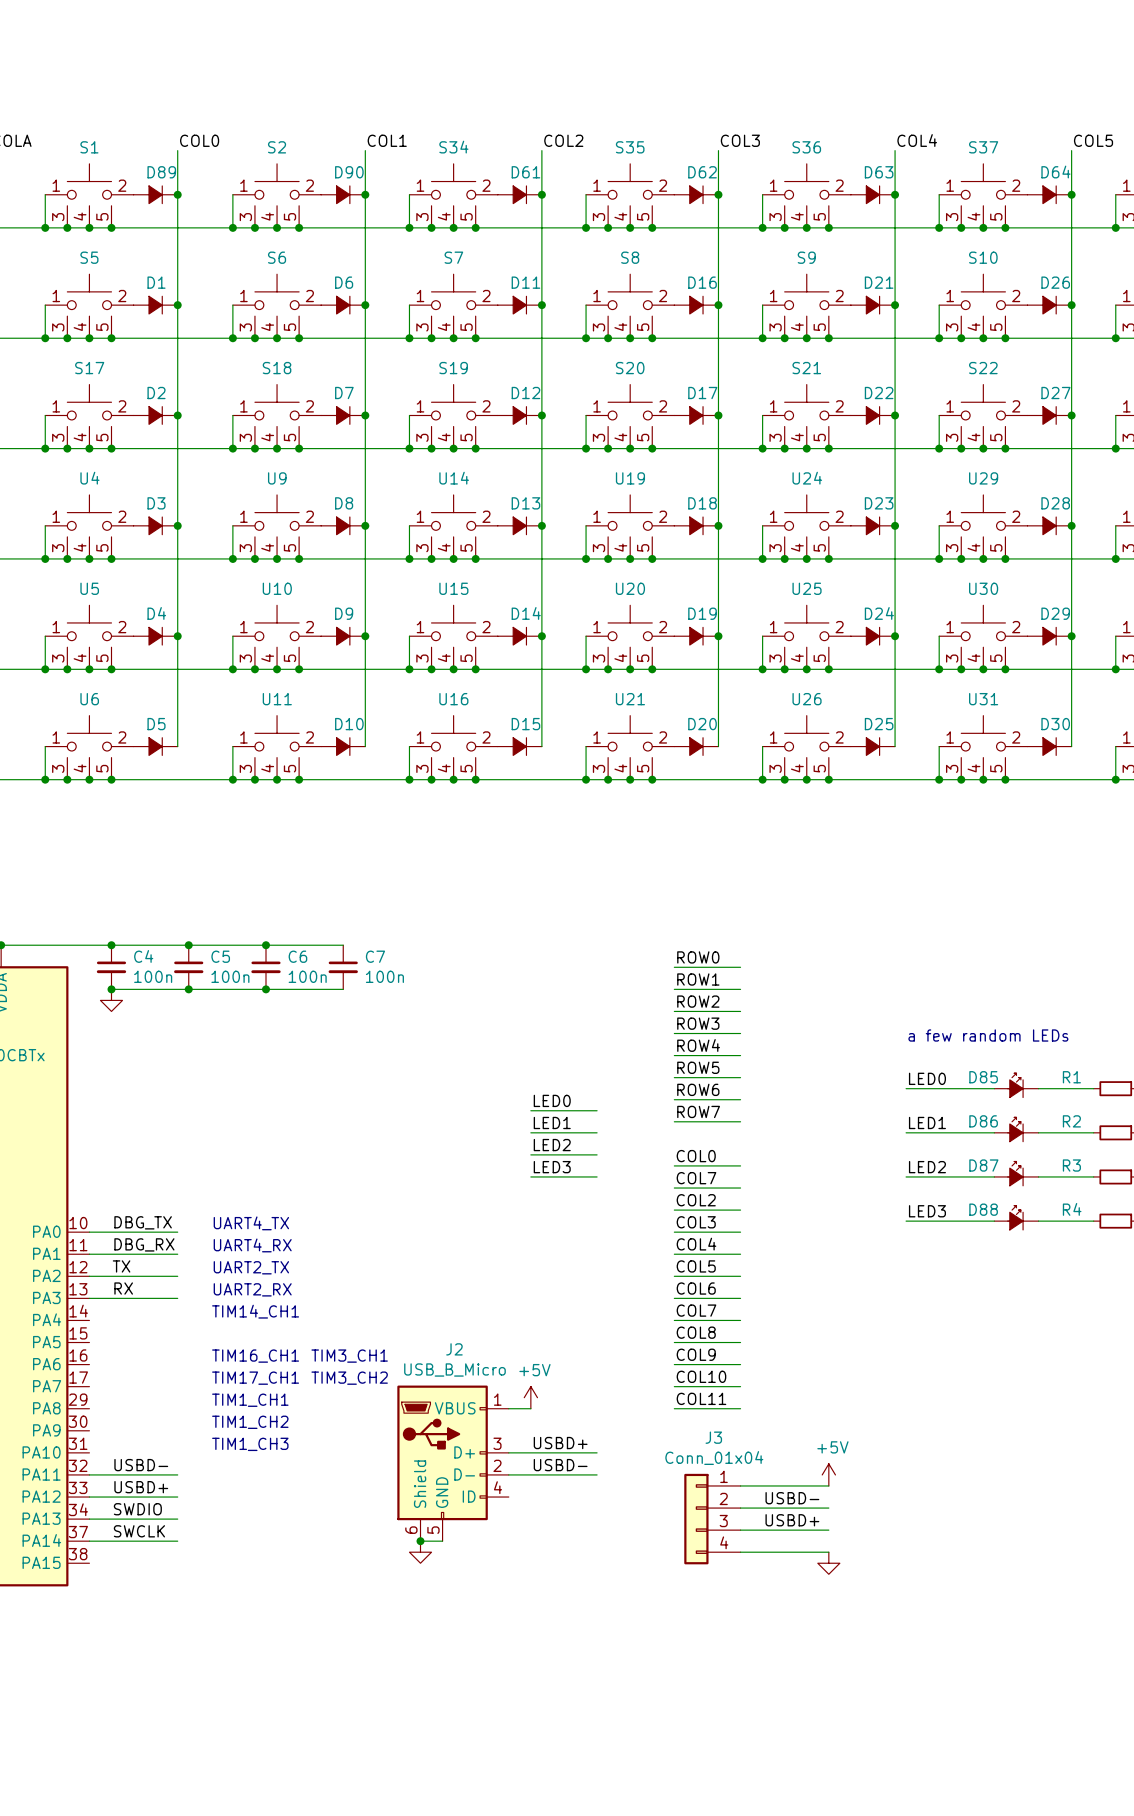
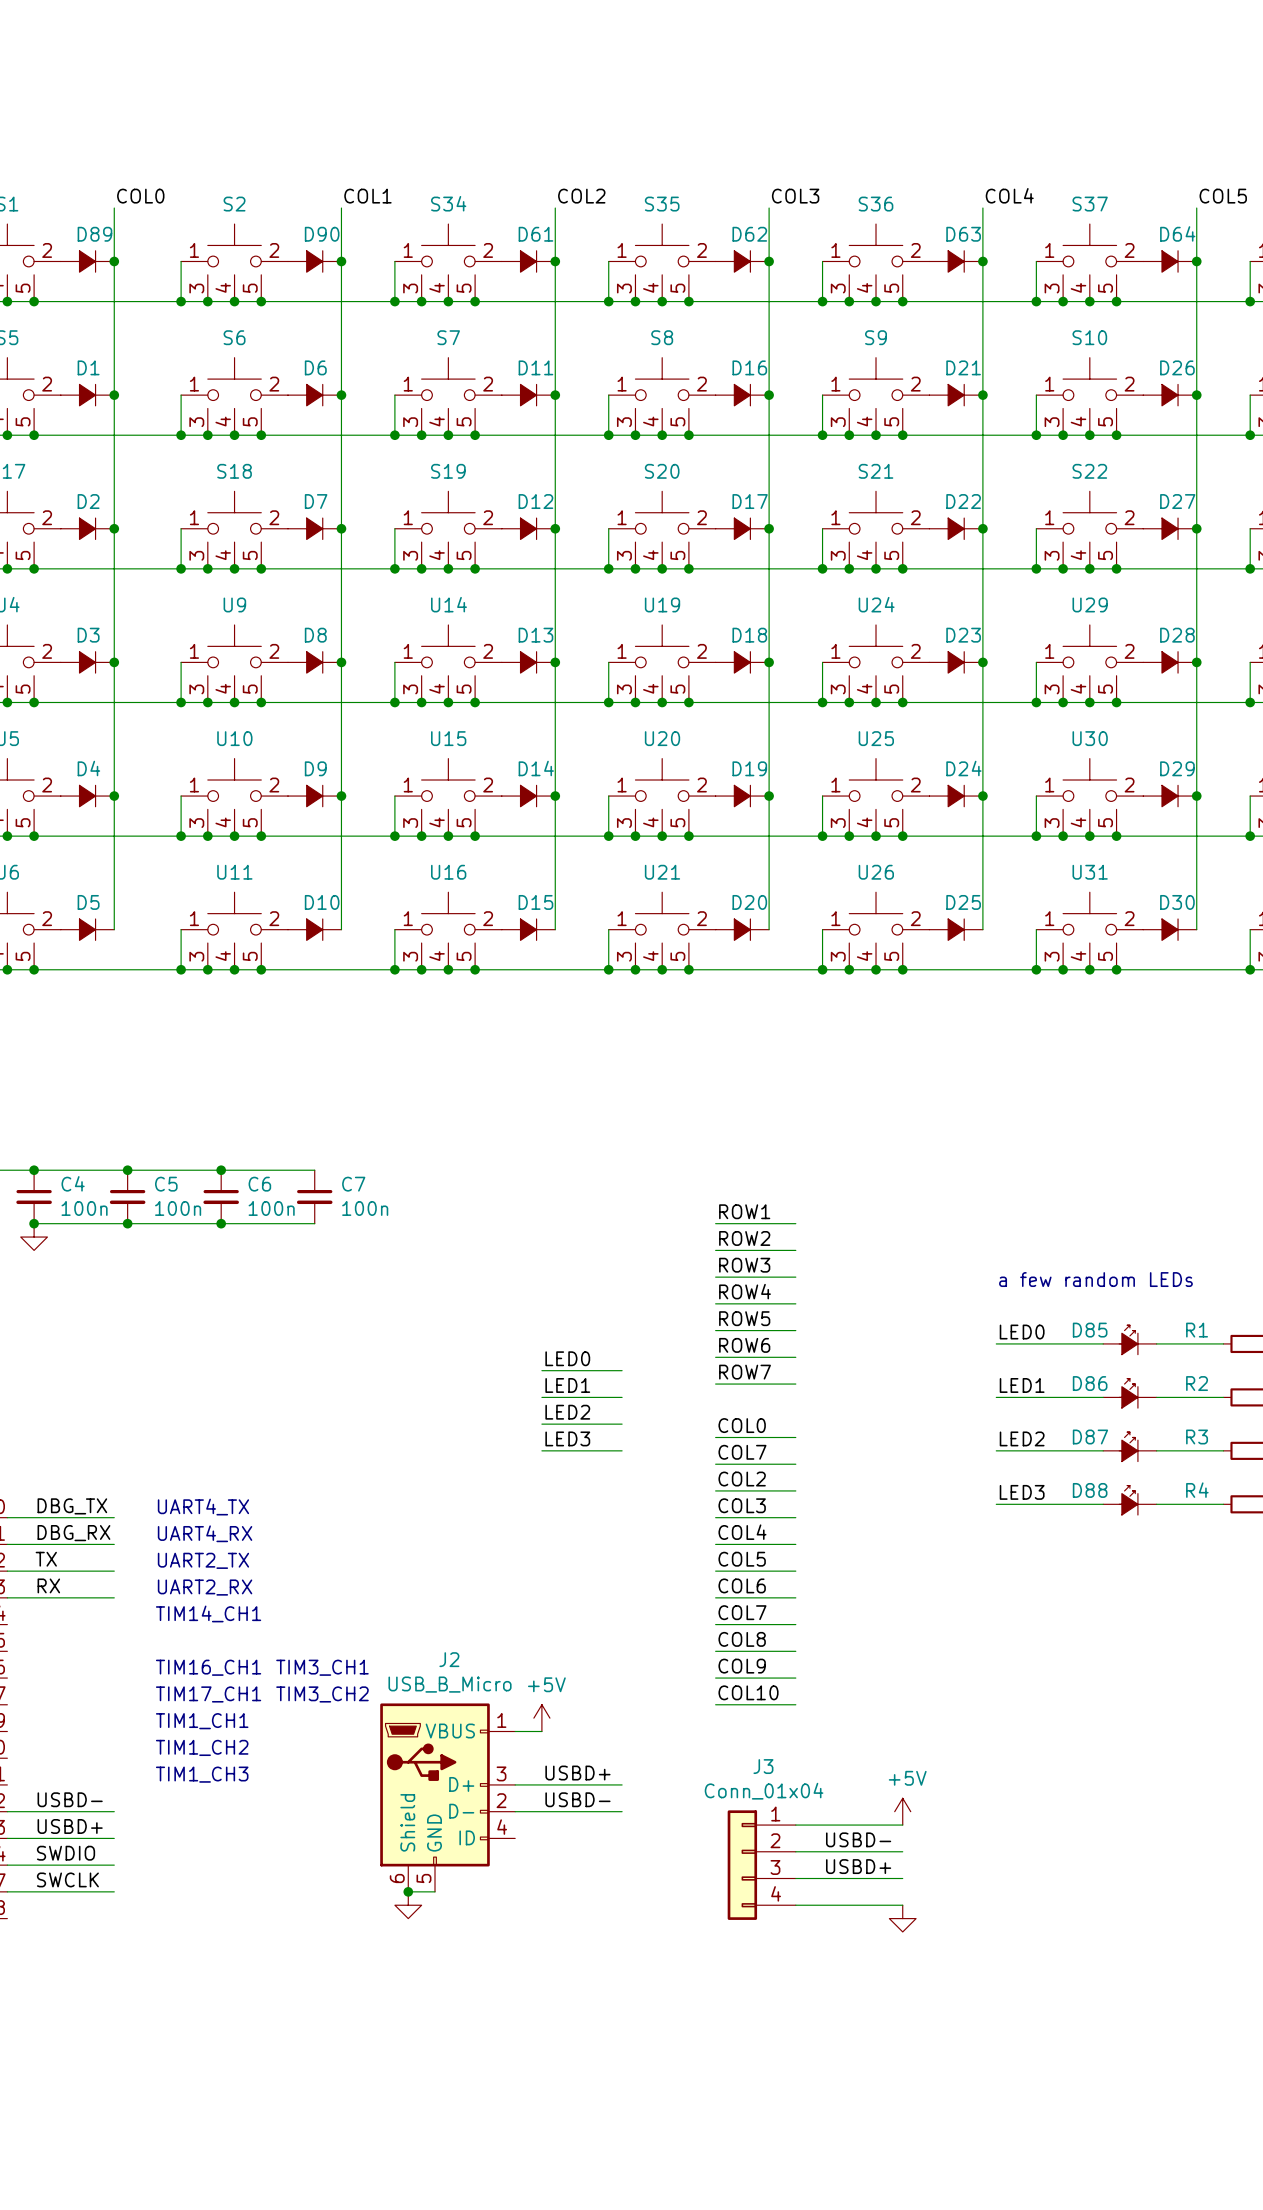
label: ROW0 (698, 957) -> none
wire: (674, 967) (740, 967) -> none
label: COL11 (701, 1398) -> none
wire: (674, 1408) (740, 1408) -> none

